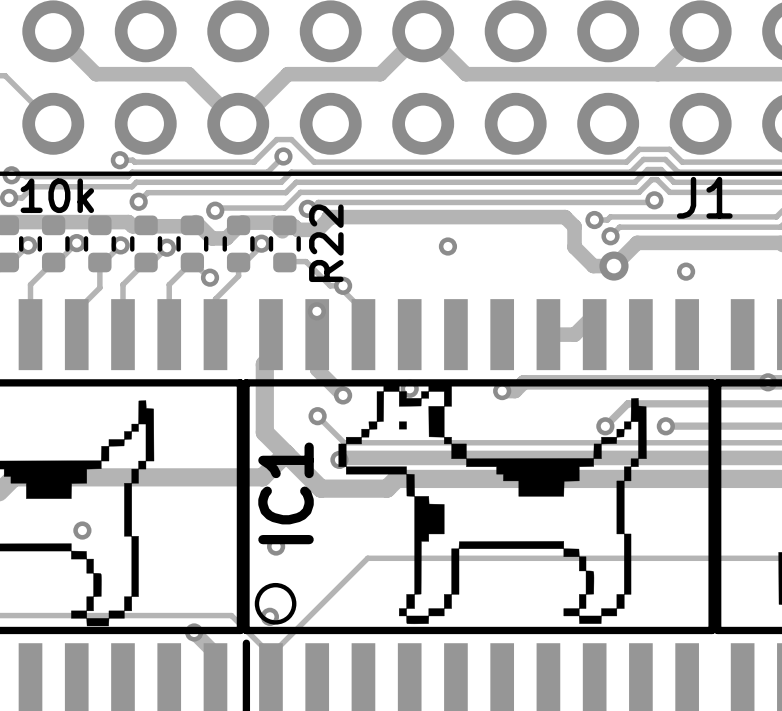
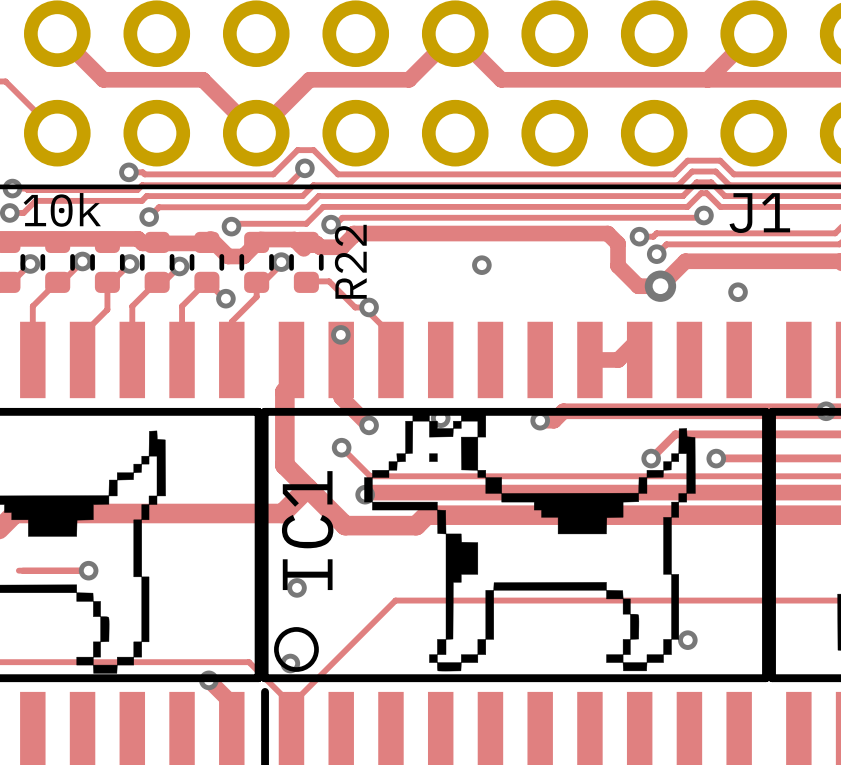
track: none -> (18, 570) (88, 570)
via: none -> (687, 640)

